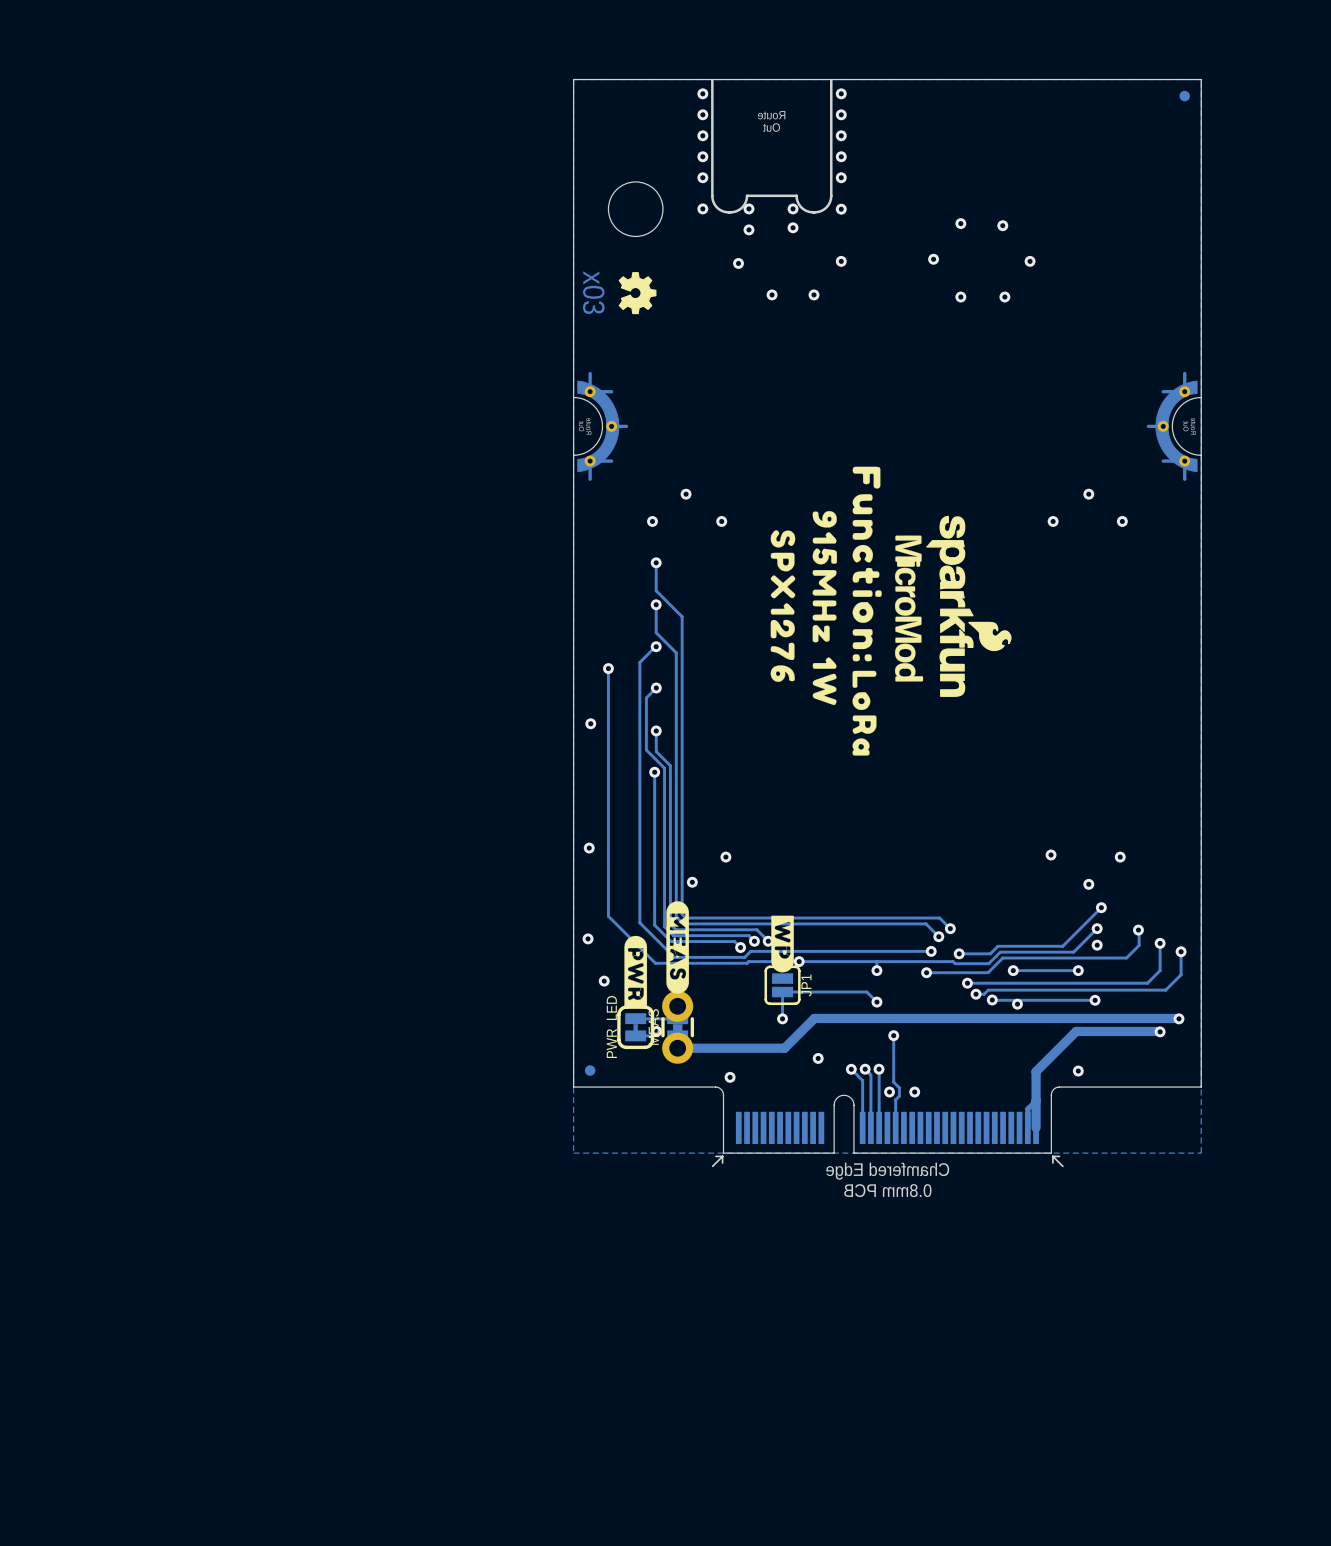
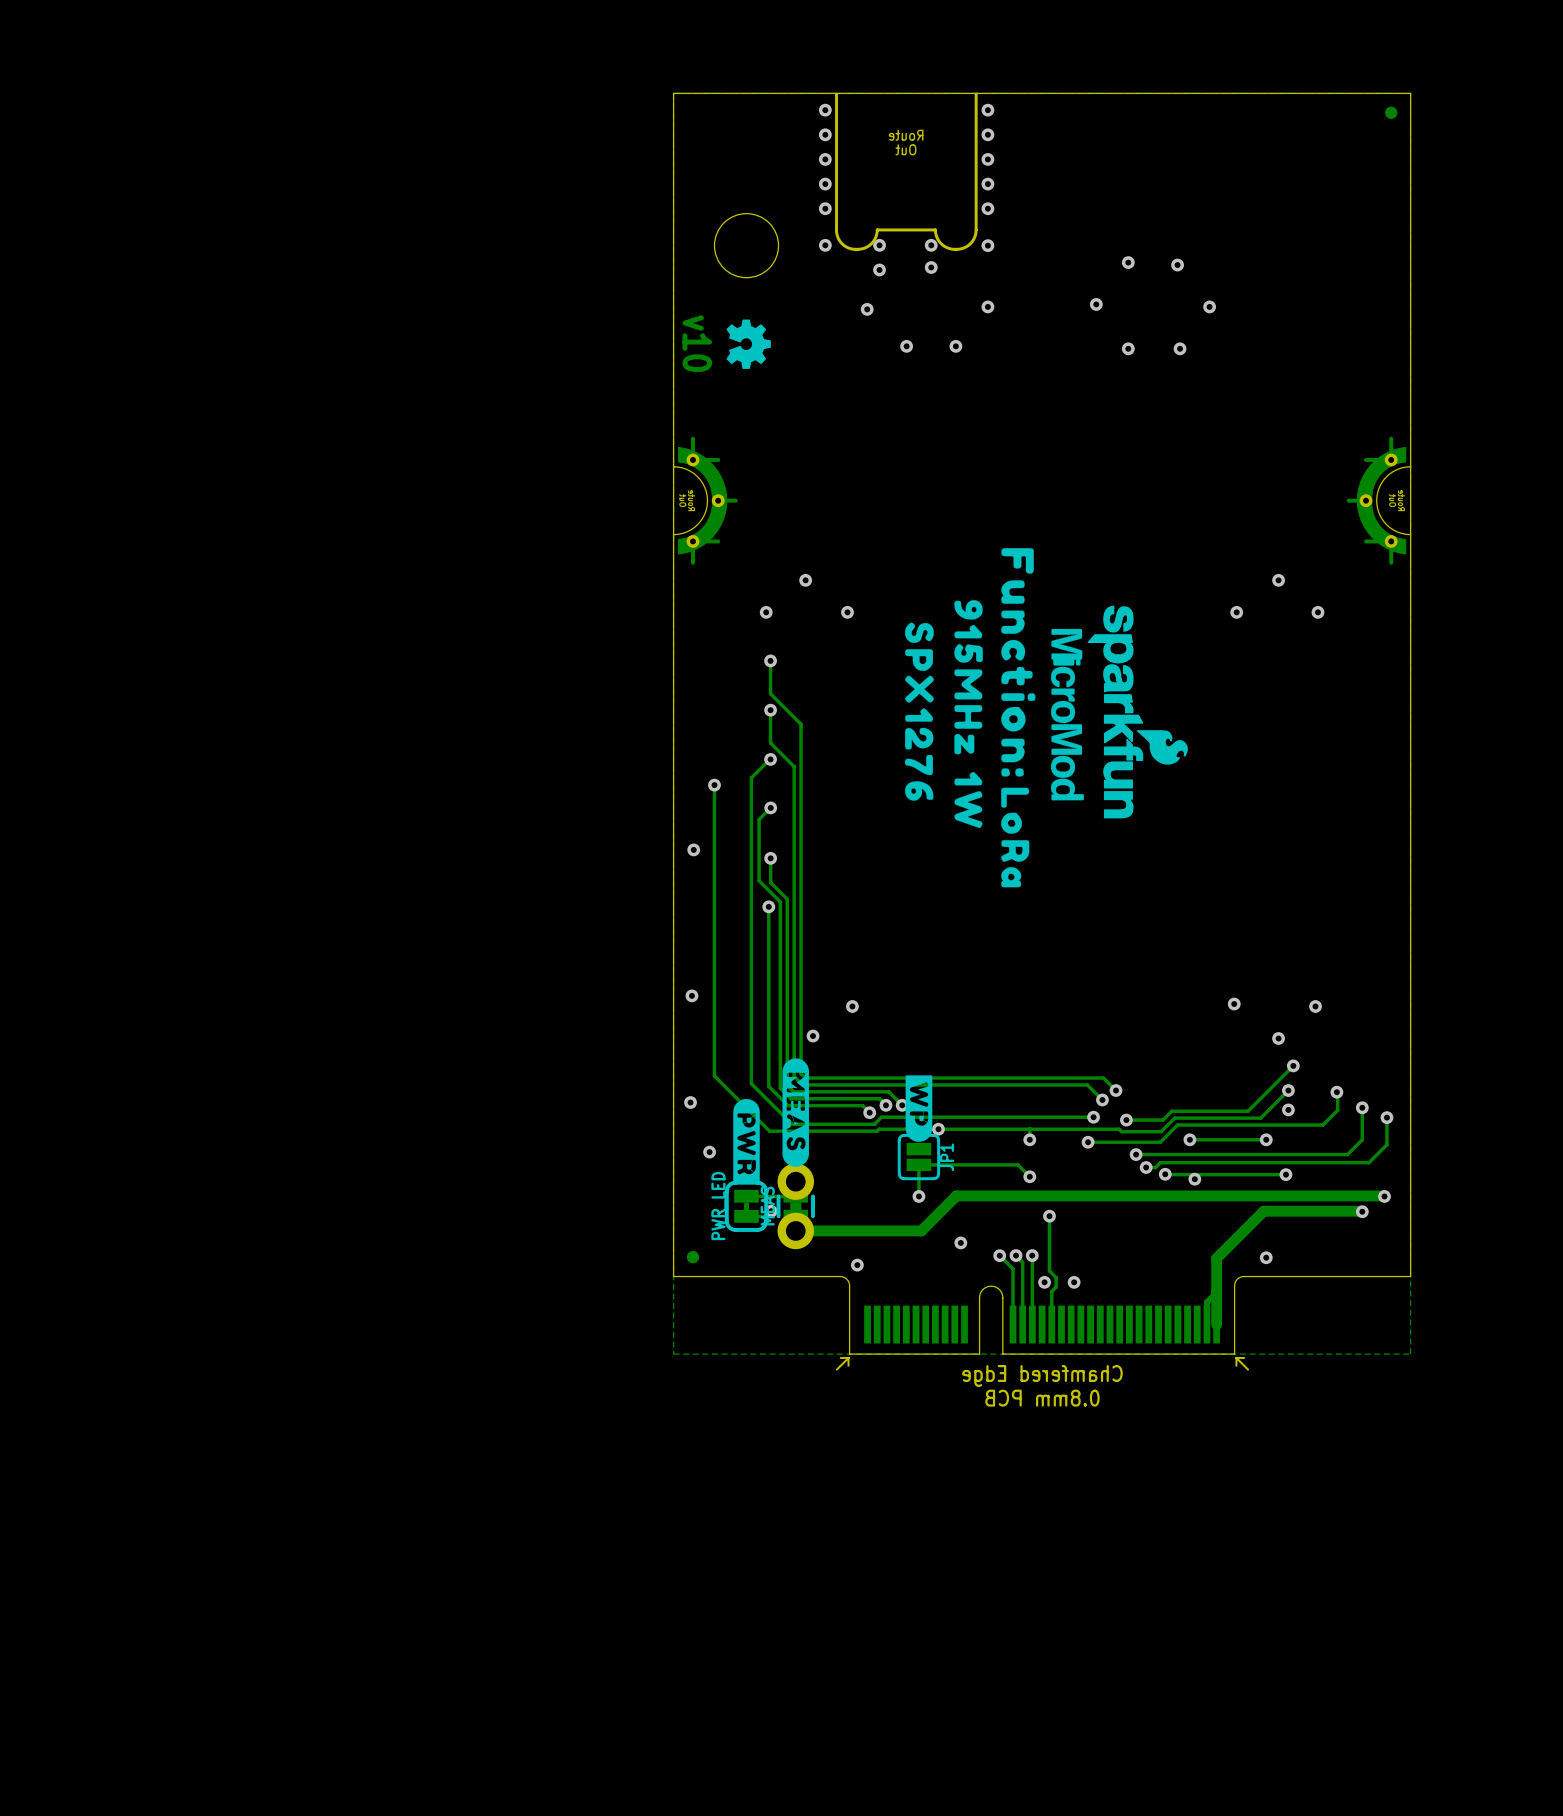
text: x03 (593, 292) -> v10 (697, 343)

